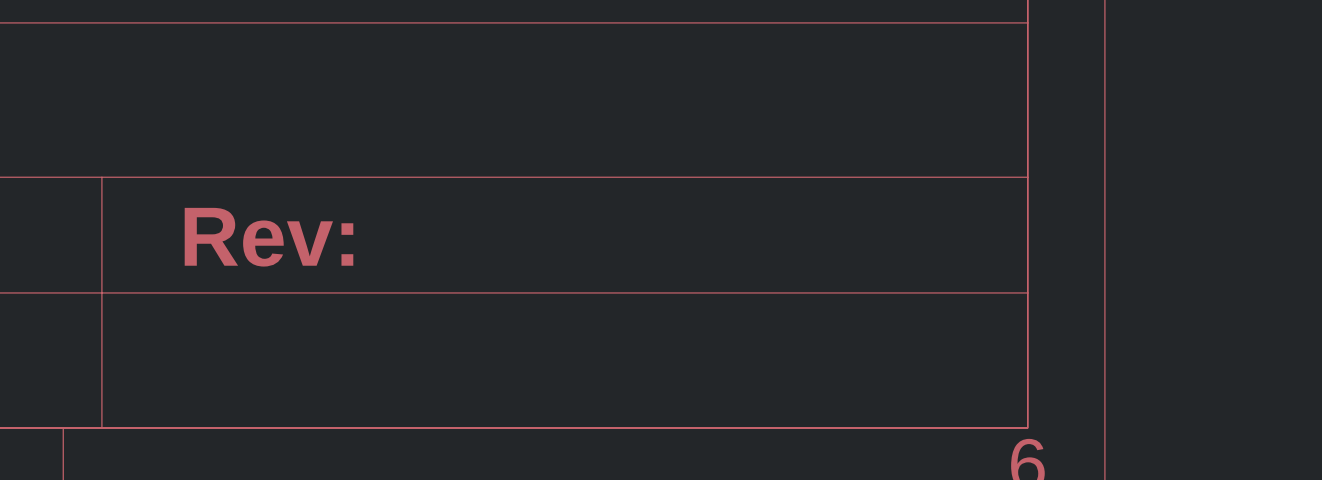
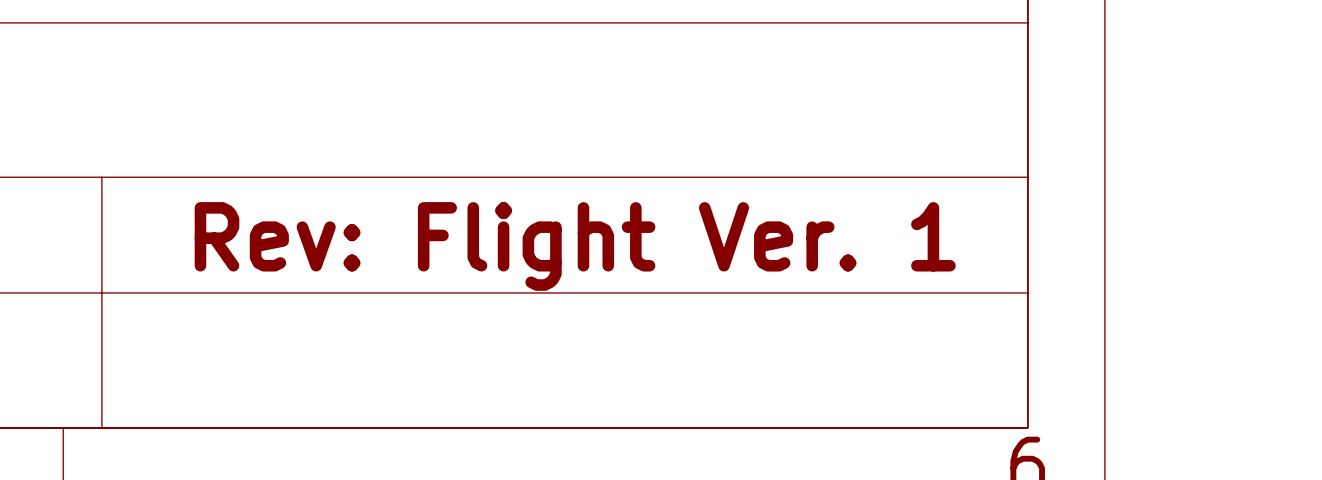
title block: Rev: (269, 237) -> Rev: Flight Ver. 1 (575, 246)

